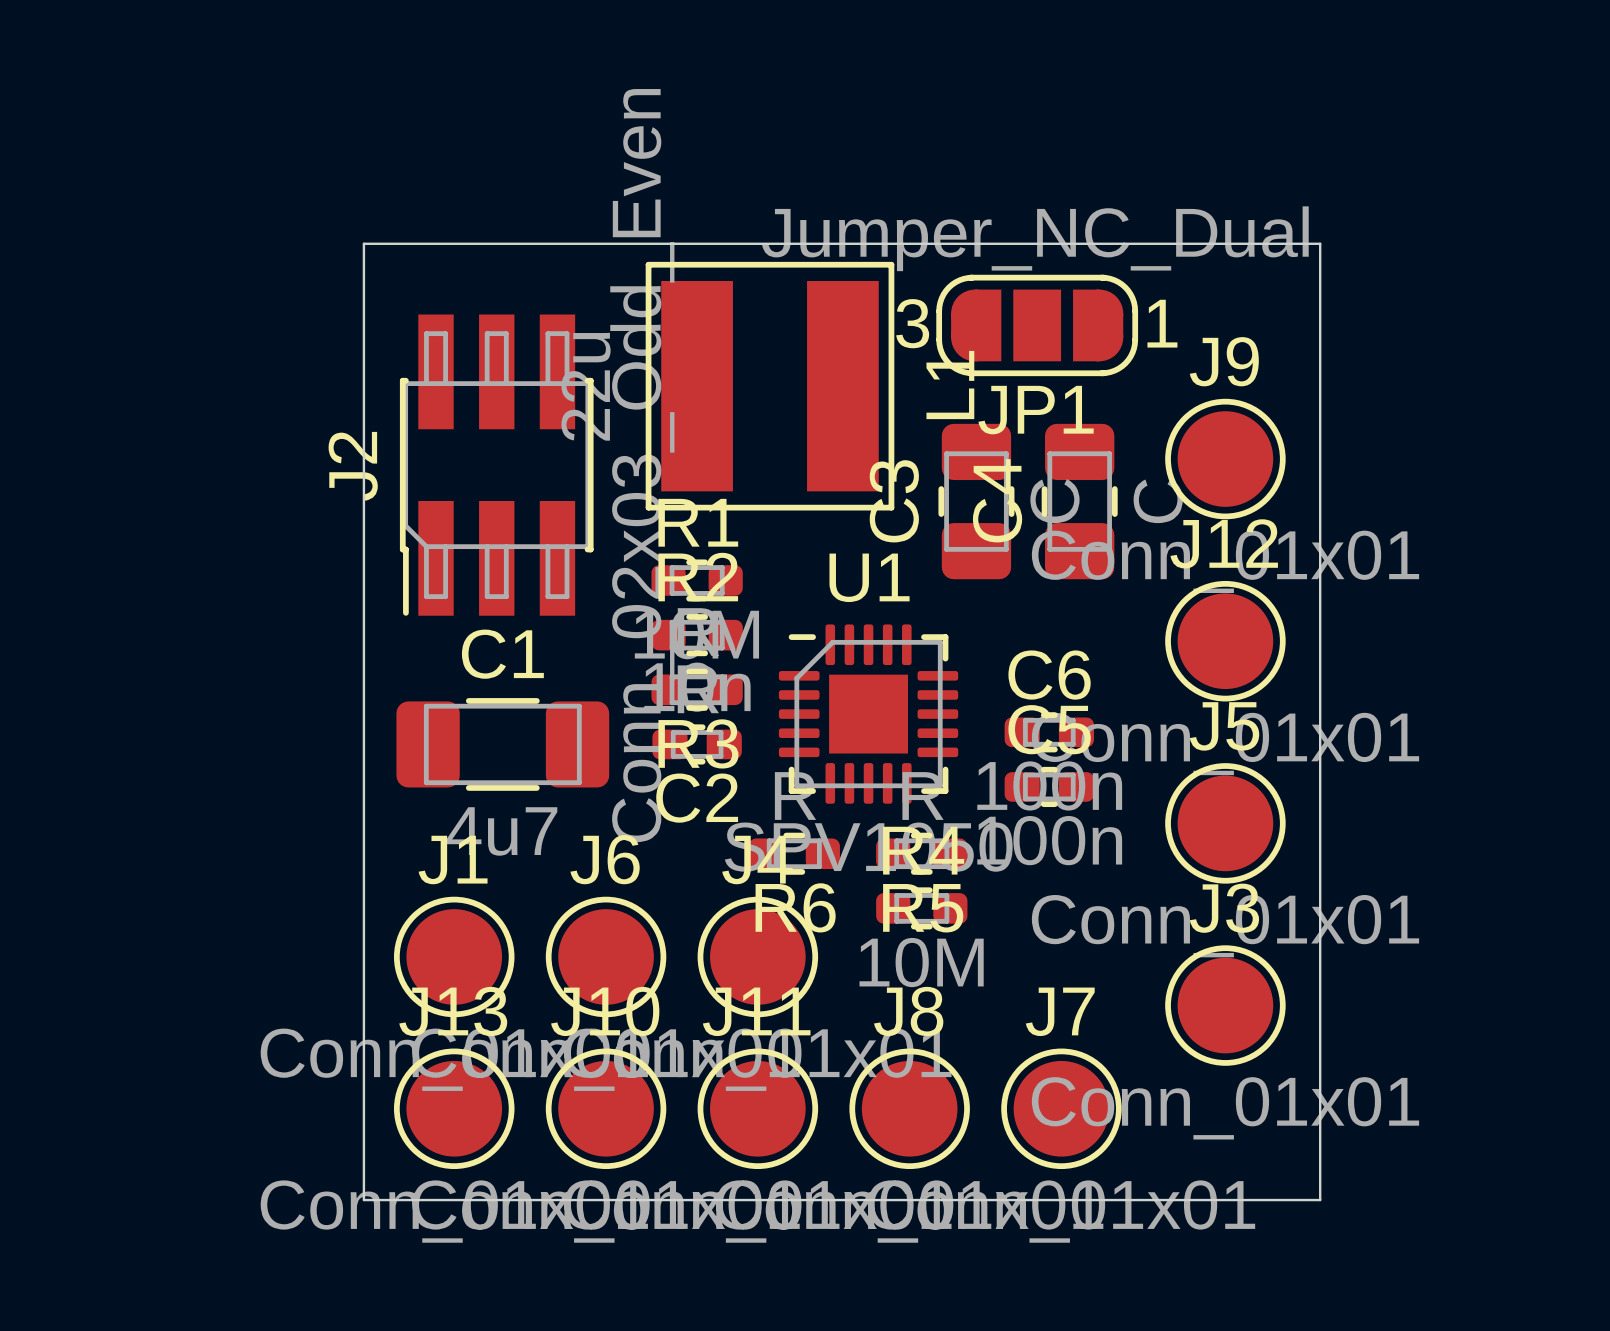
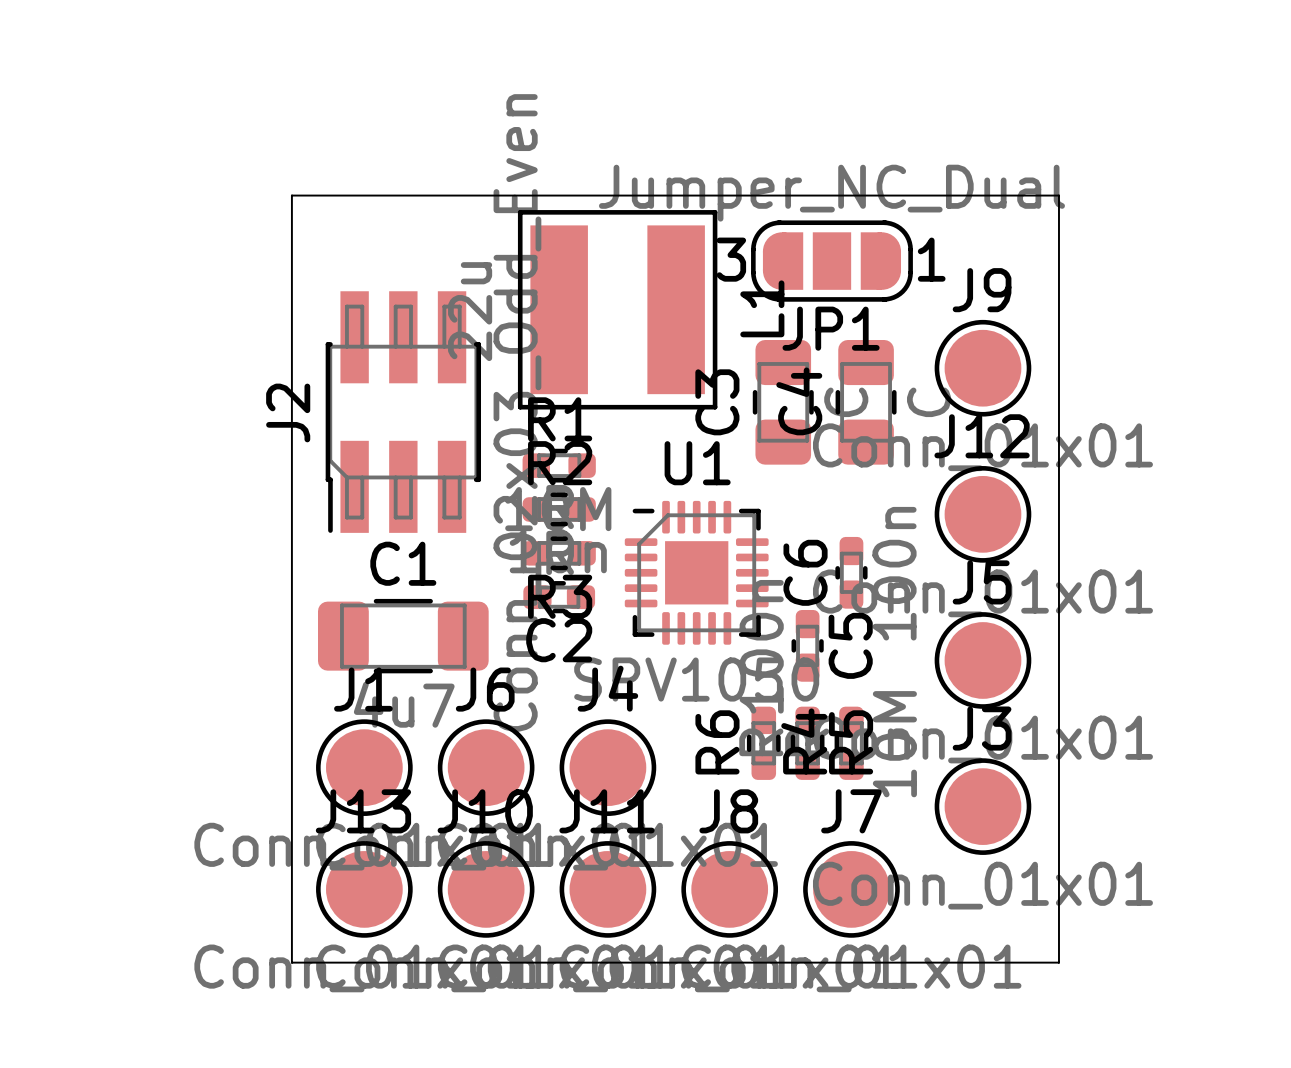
J2 position: (496, 465) -> (403, 412)
C6 rotation: 0° (1049, 732) -> 90° clockwise (851, 572)
C1 position: (502, 744) -> (403, 636)
C5 rotation: 0° (1049, 786) -> 90° clockwise (807, 645)
R6 rotation: 0° (794, 853) -> 90° clockwise (763, 743)
R6 position: (794, 853) -> (763, 743)
R5 rotation: 0° (921, 853) -> 90° clockwise (807, 743)
R5 position: (921, 853) -> (807, 743)
R4 rotation: 0° (921, 908) -> 90° clockwise (851, 743)
R4 position: (921, 908) -> (851, 743)

